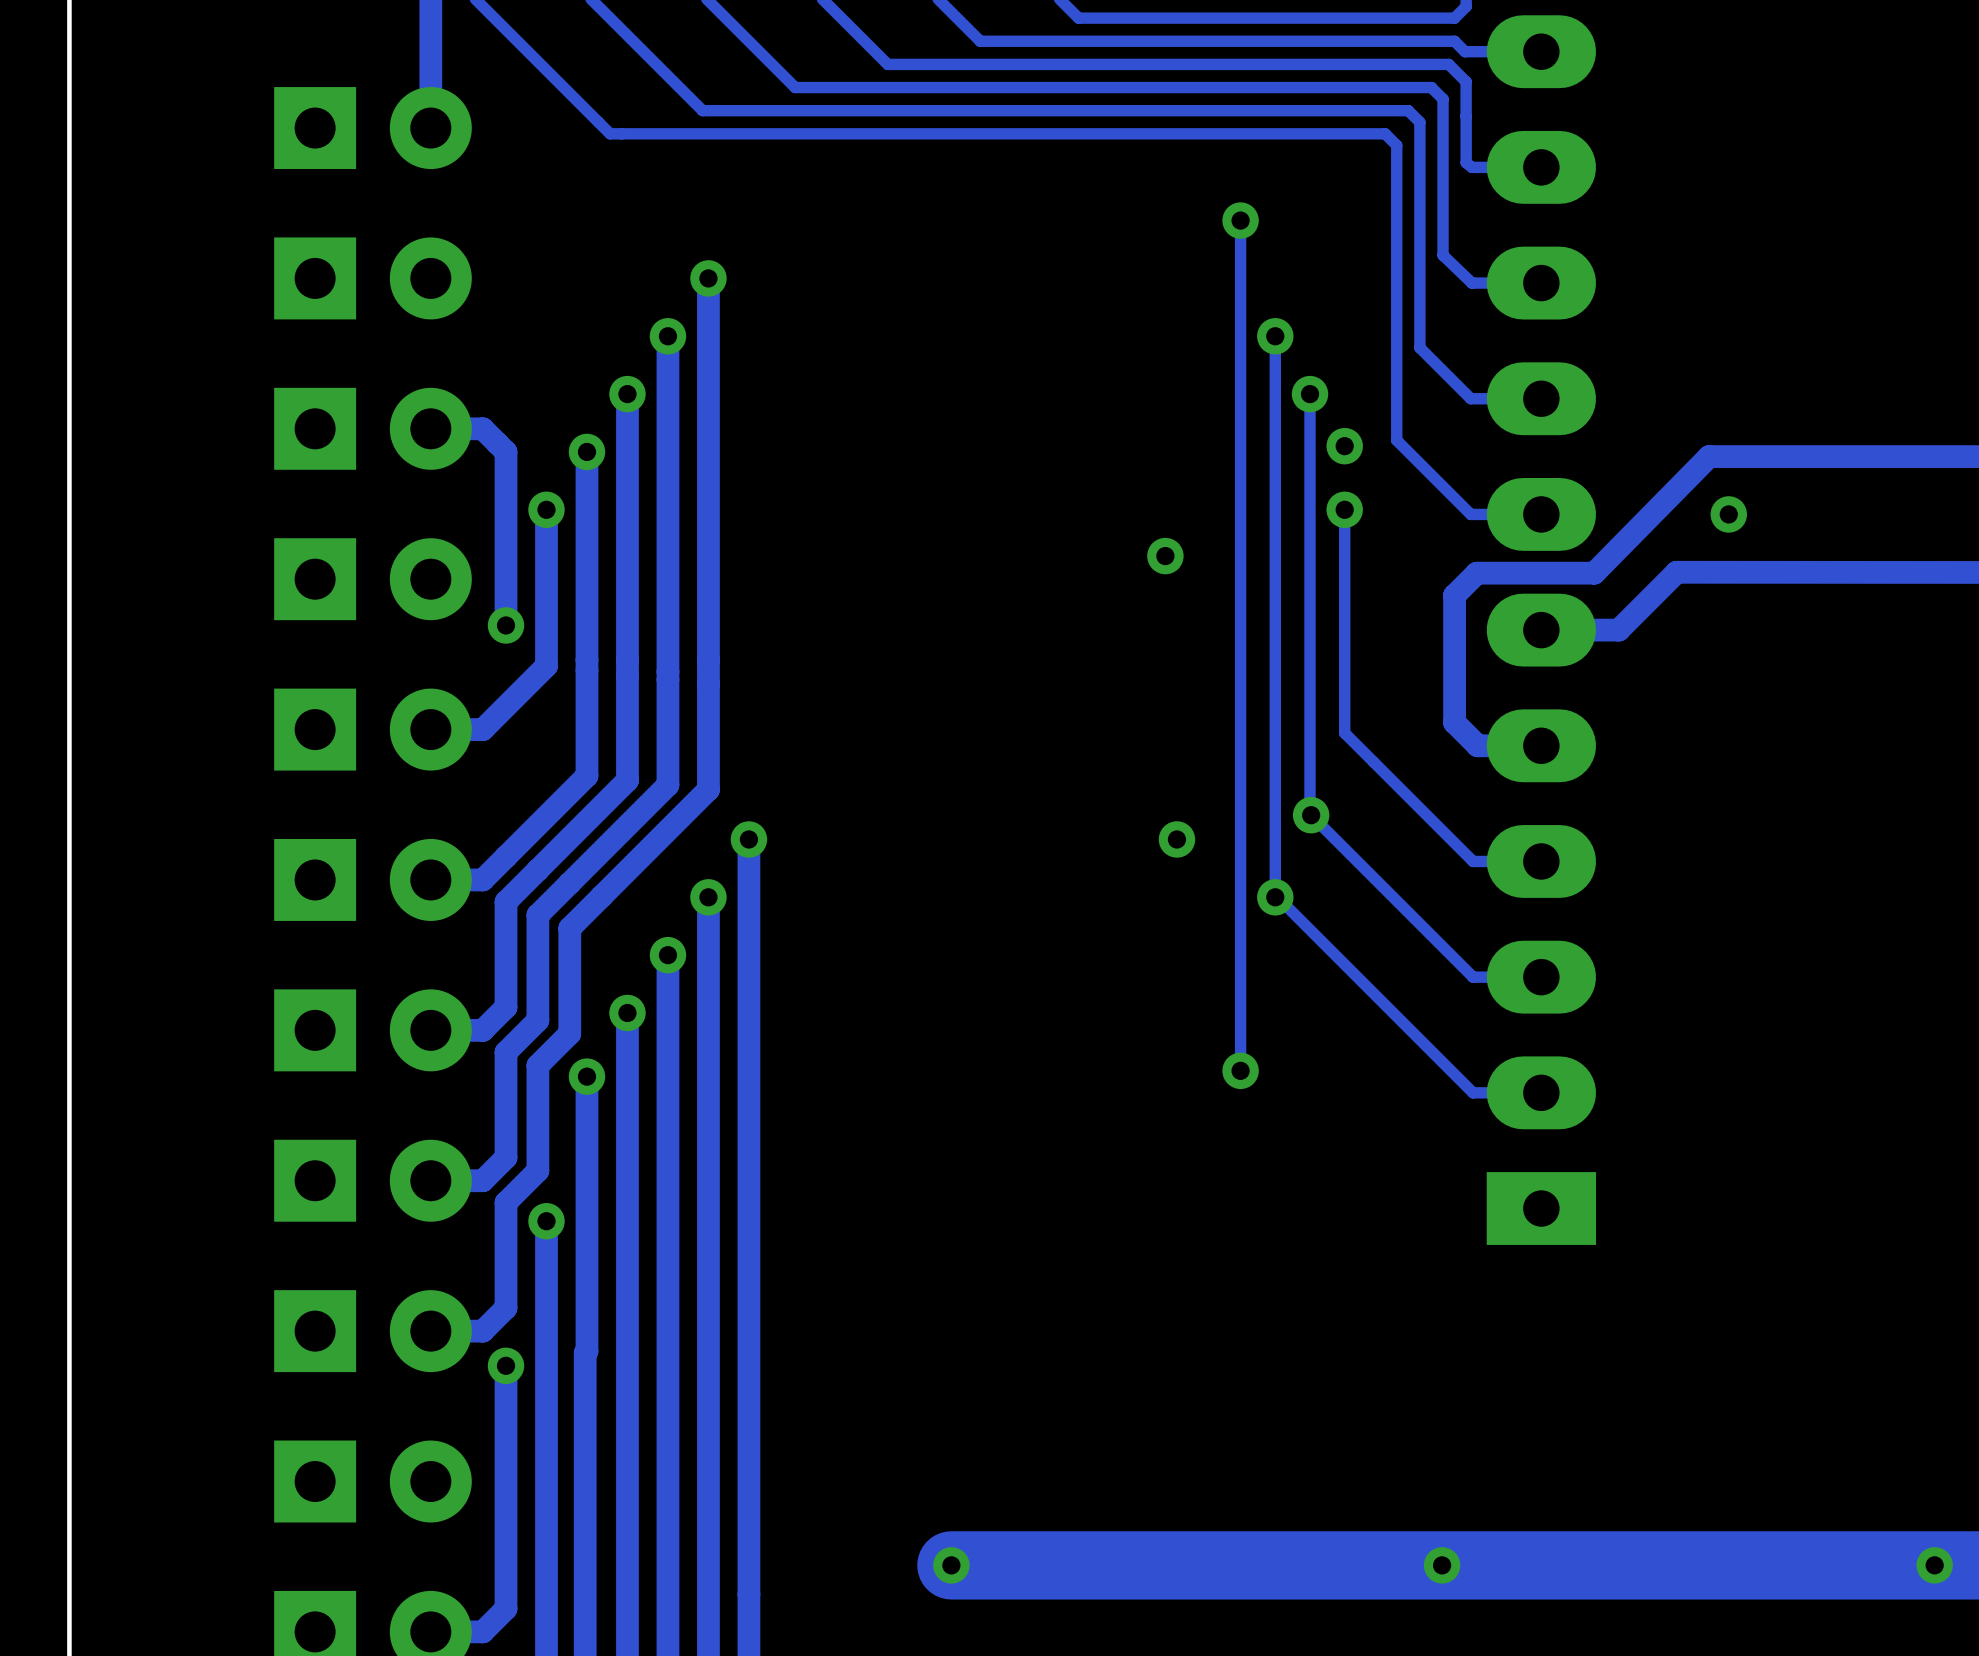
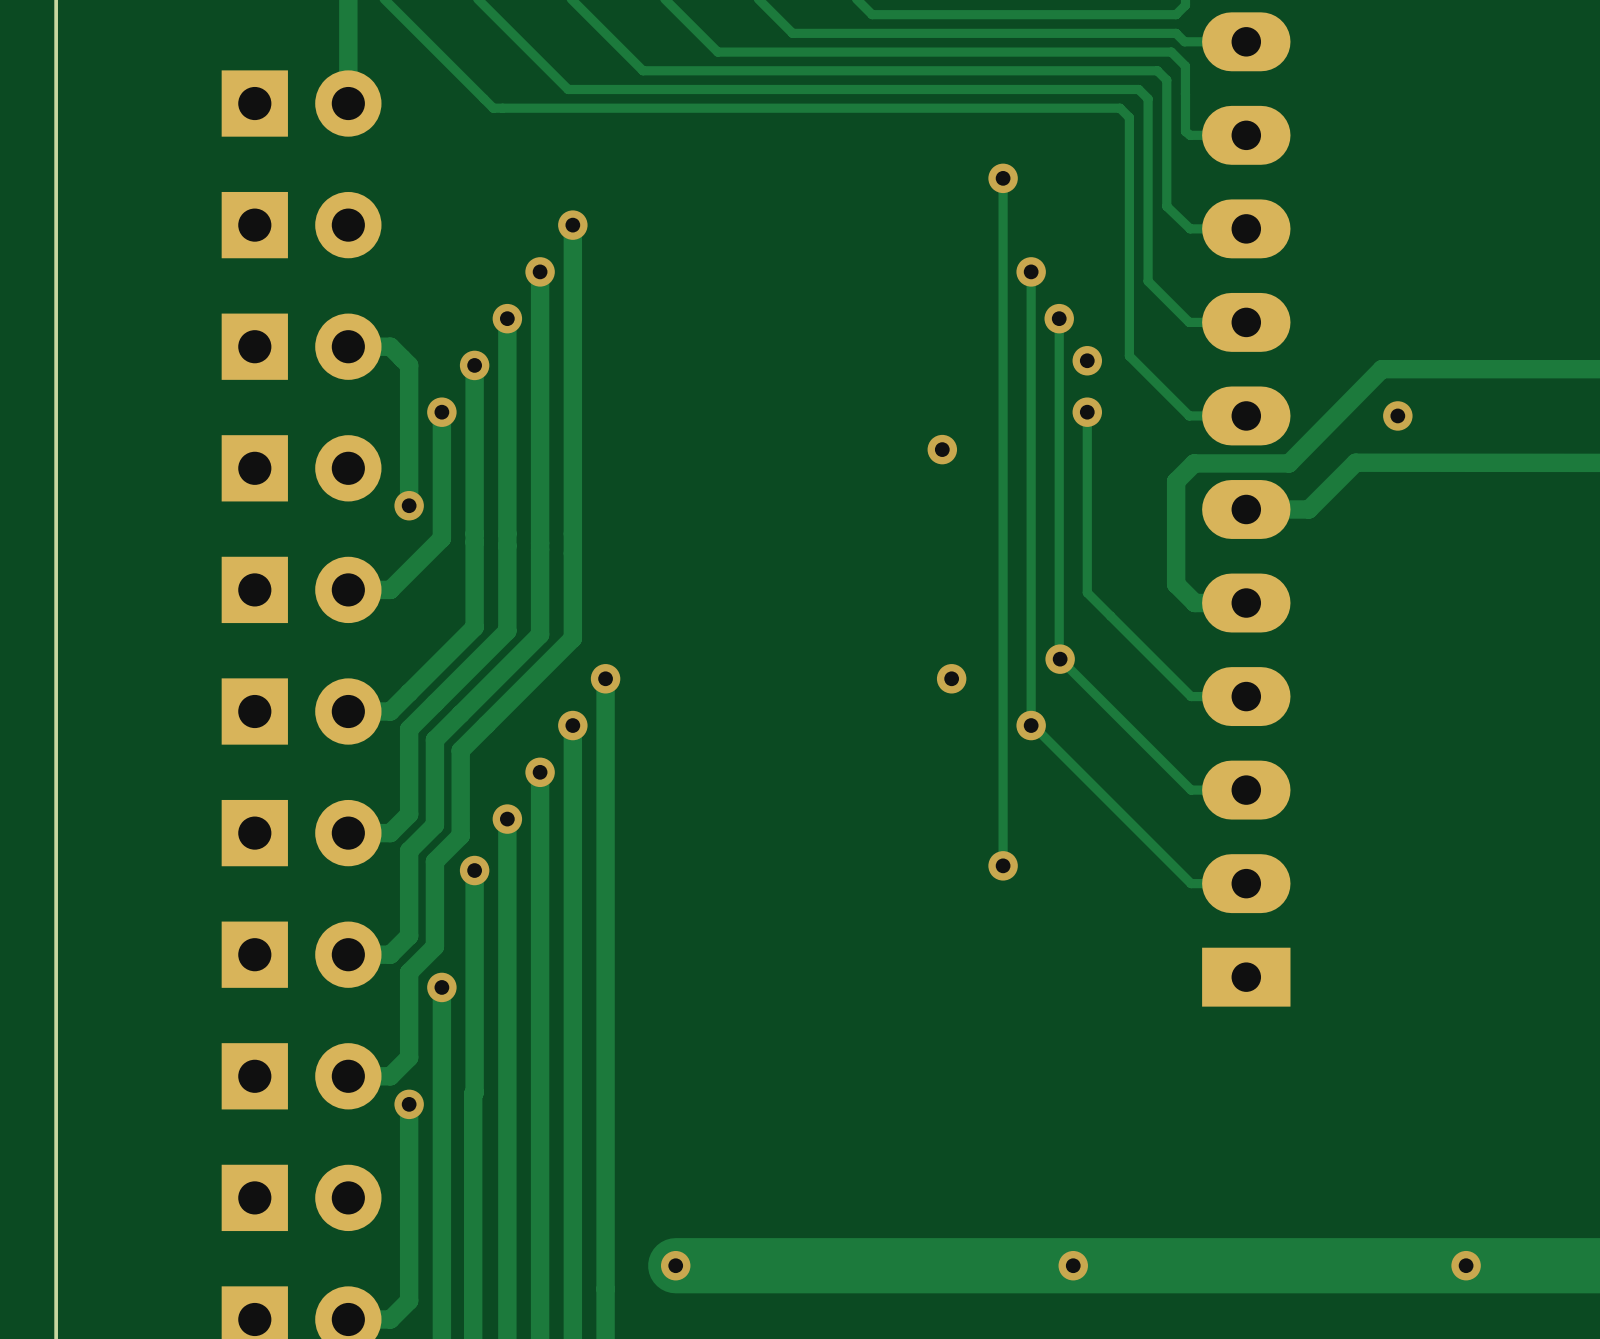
track: none -> (769, 1265) (675, 1265)
via position: (951, 1565) -> (675, 1265)
via position: (1442, 1565) -> (1073, 1265)
via position: (1934, 1565) -> (1466, 1265)

